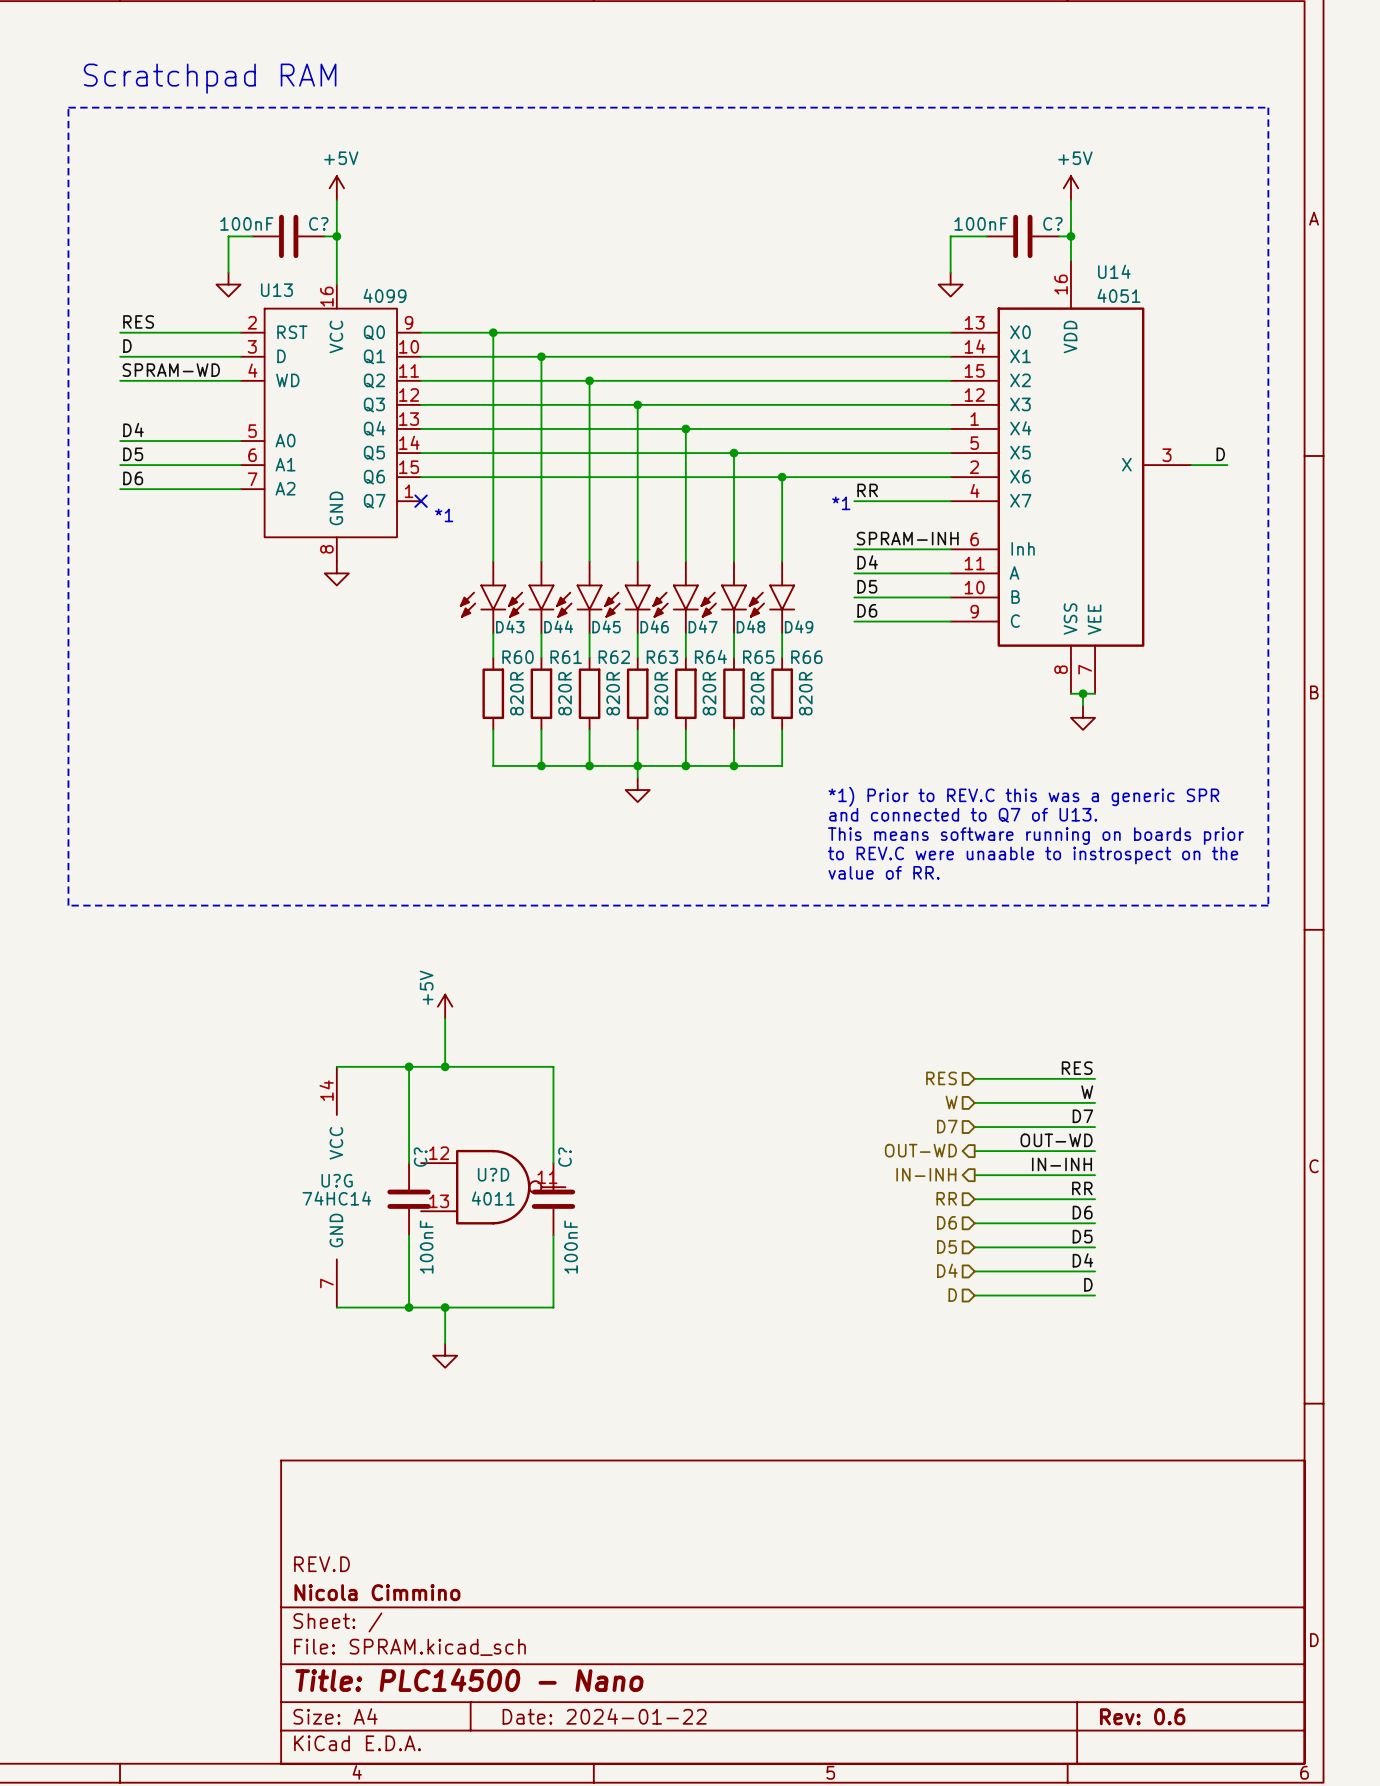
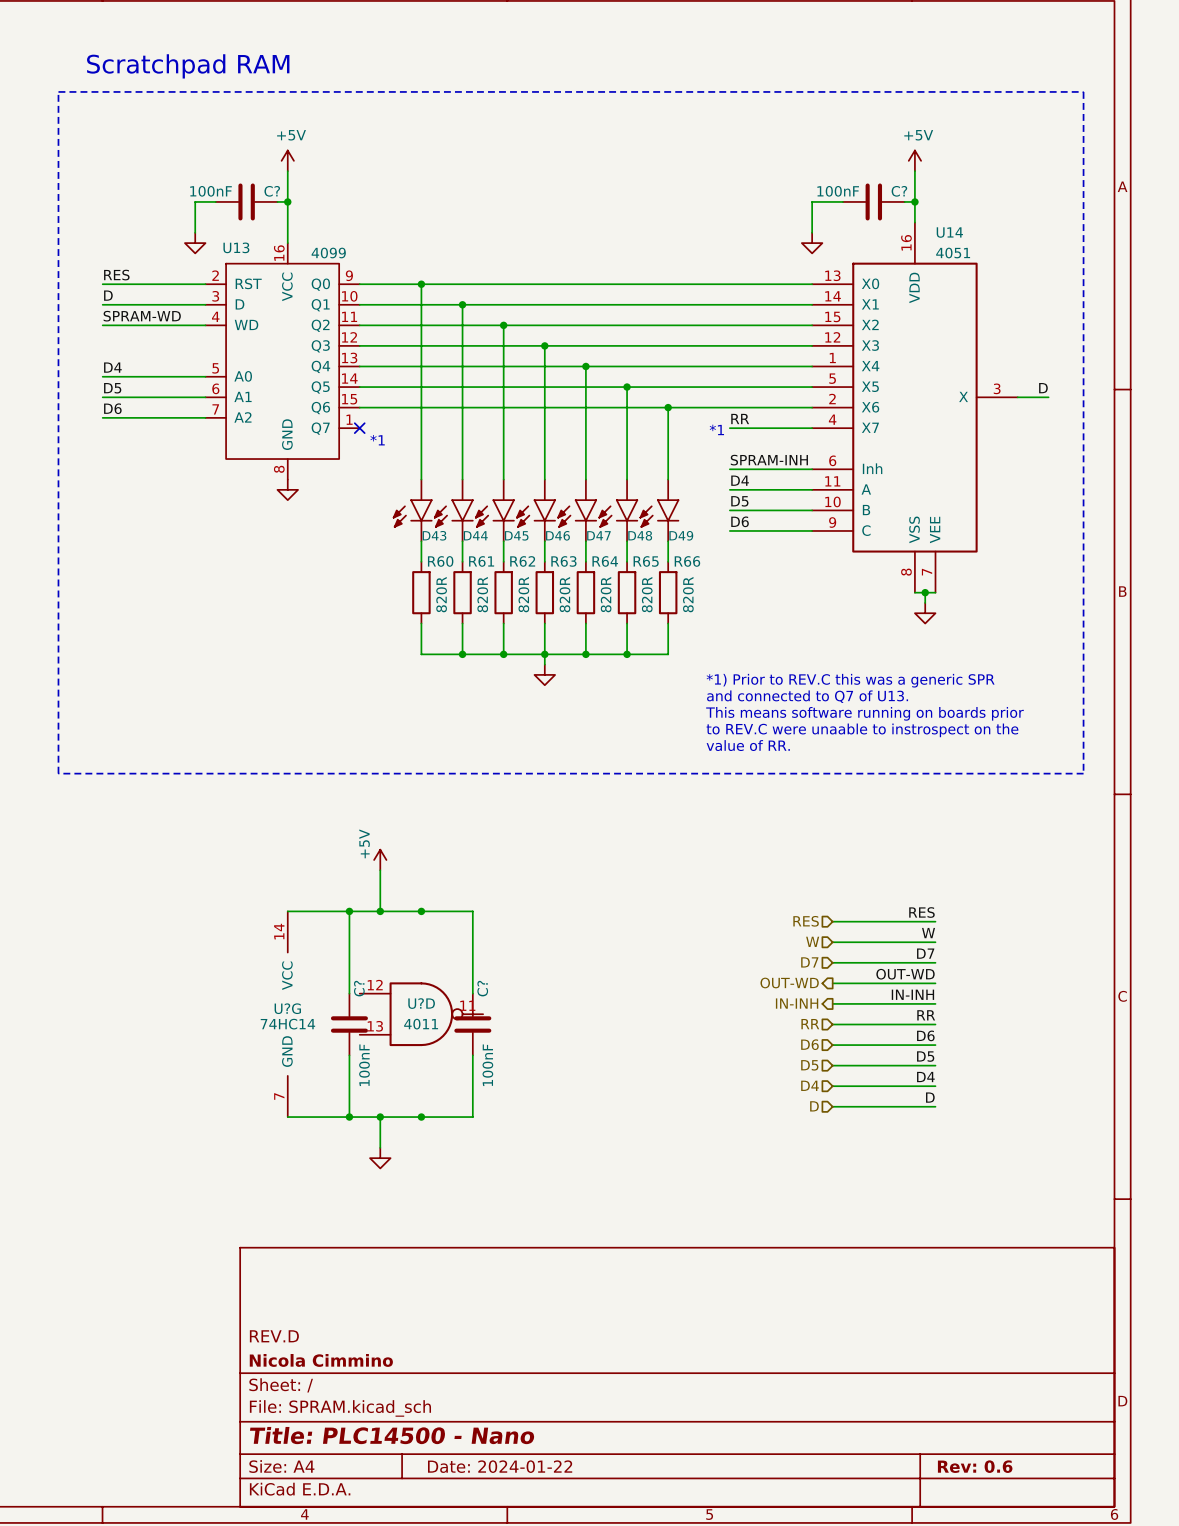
junction: none -> (421, 911)
junction: none -> (421, 1117)

